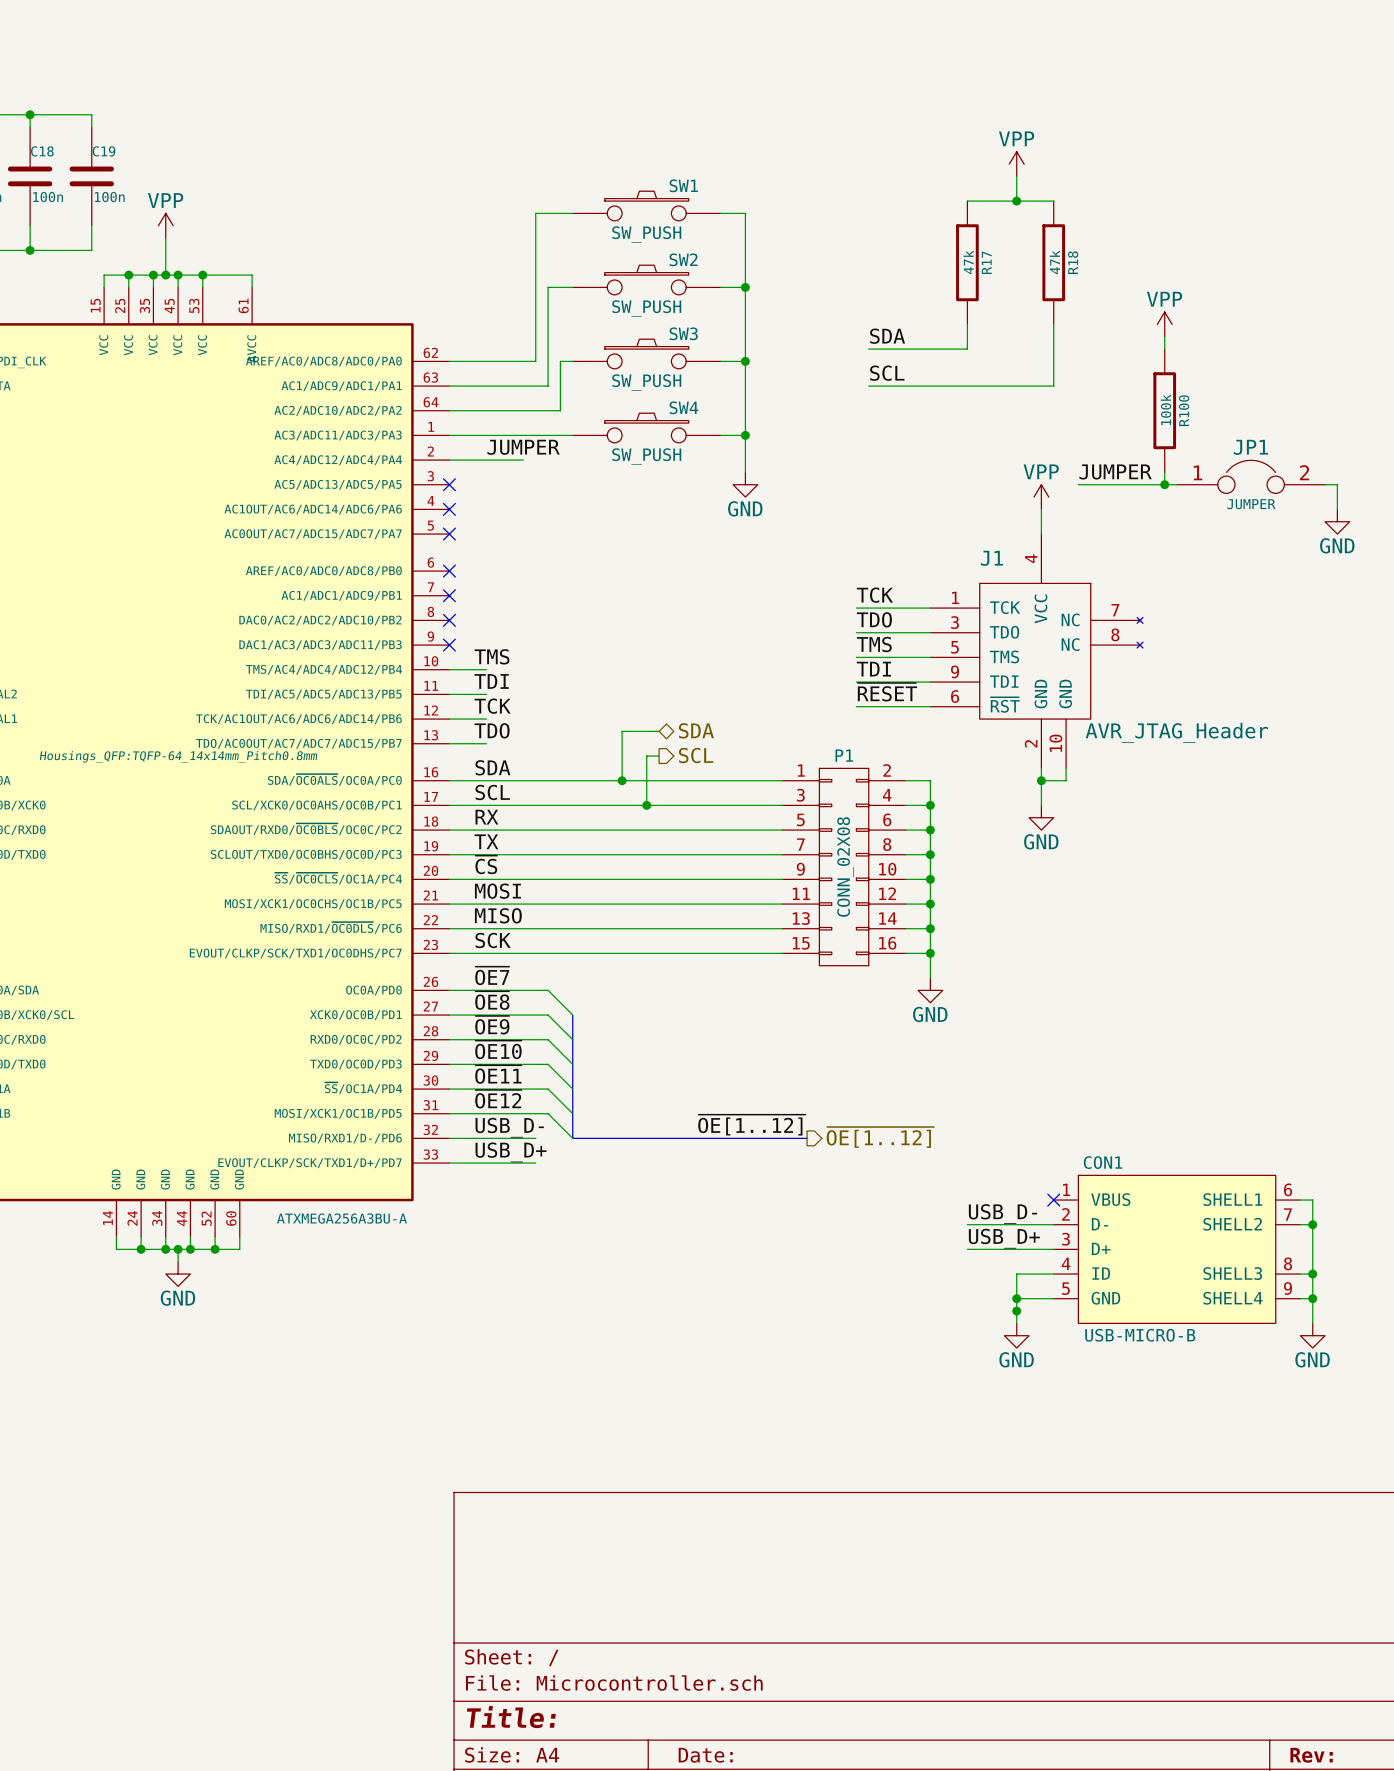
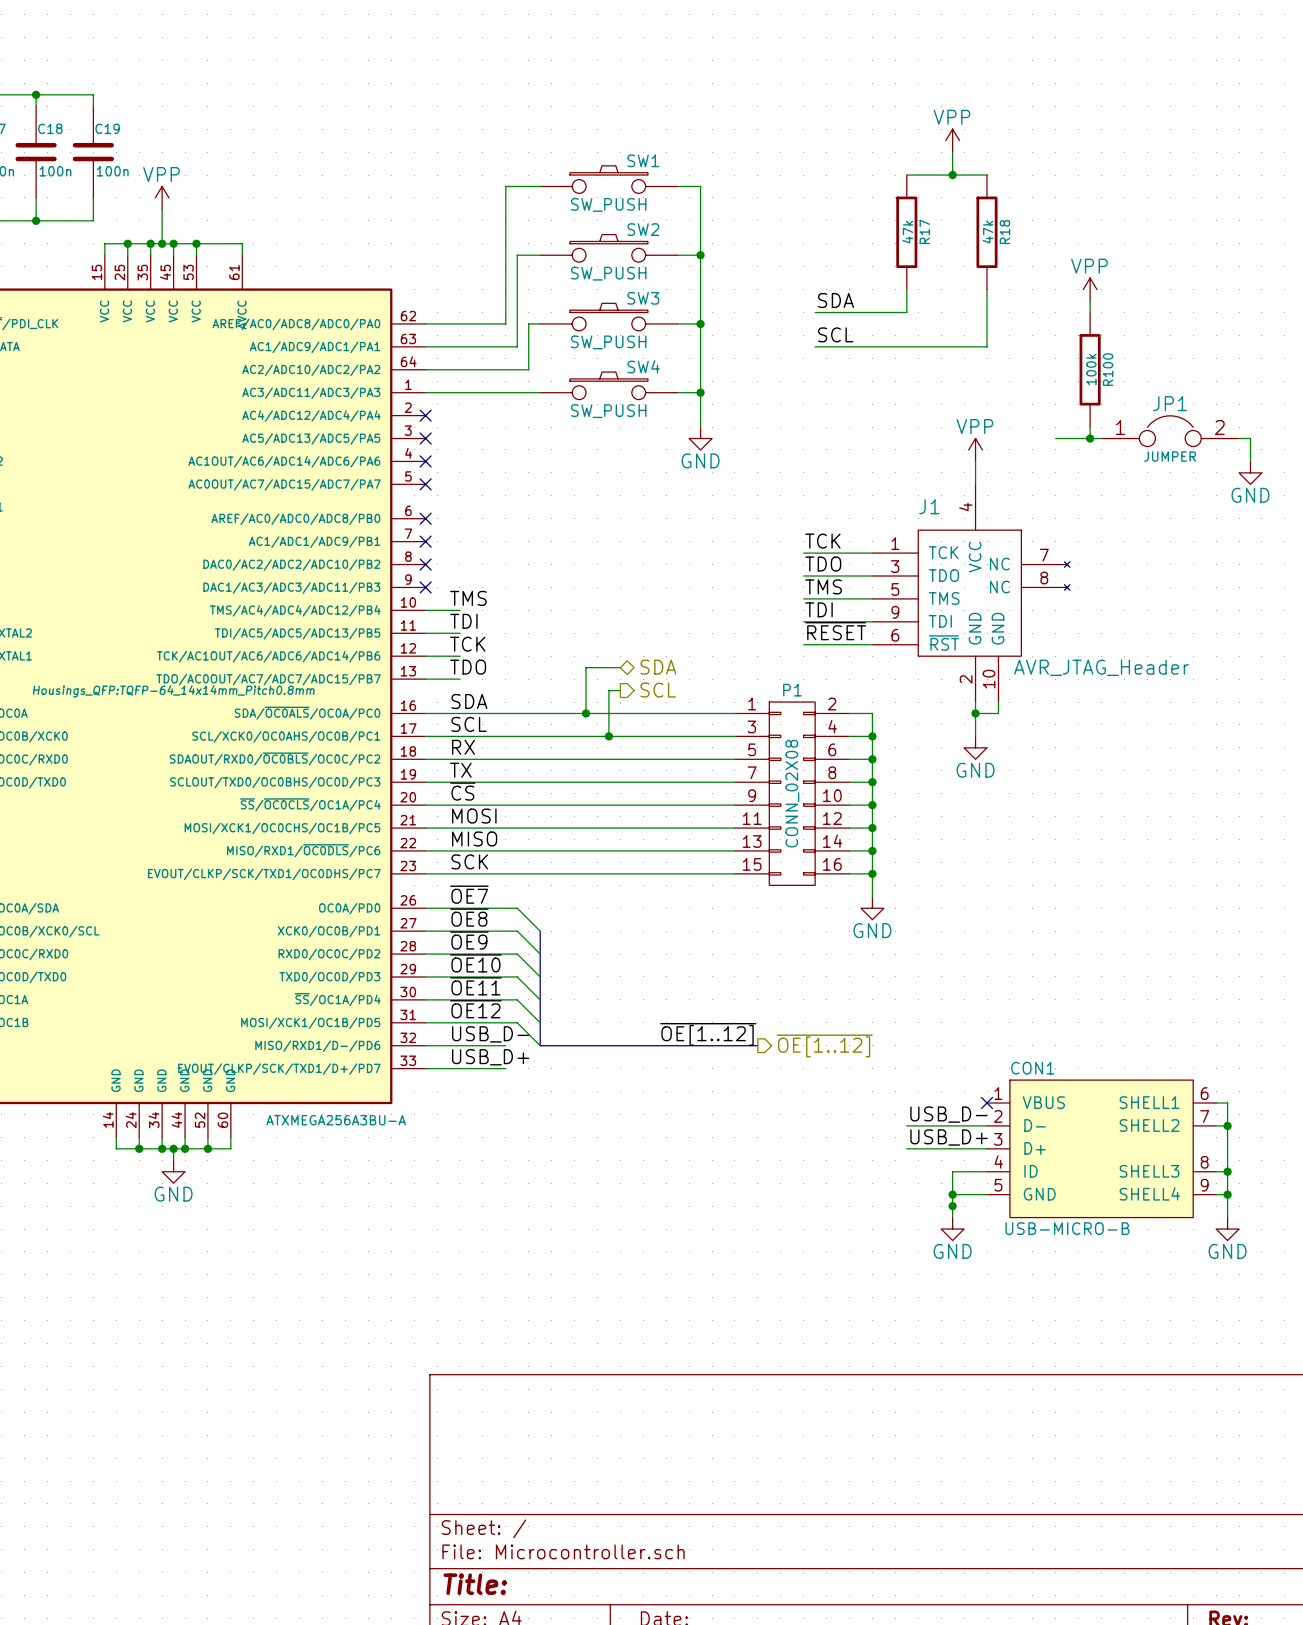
label: JUMPER (523, 447) -> none
wire: (449, 460) (523, 460) -> none
no-connect mark: none -> (425, 415)
label: JUMPER (1115, 471) -> none
wire: (1078, 484) (1127, 484) -> none

